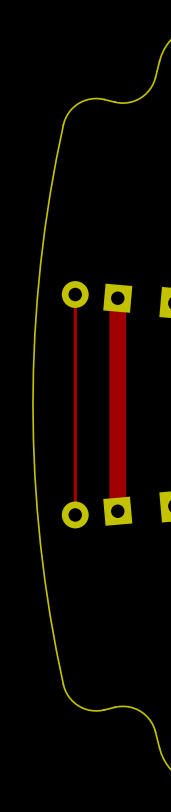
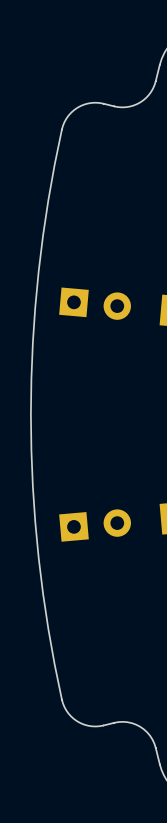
track: (75, 294) (75, 514) -> none
part rotation: 0° (97, 296) -> 180° (95, 303)
track: (117, 298) (117, 511) -> none
part rotation: 0° (97, 512) -> 180° (95, 525)

